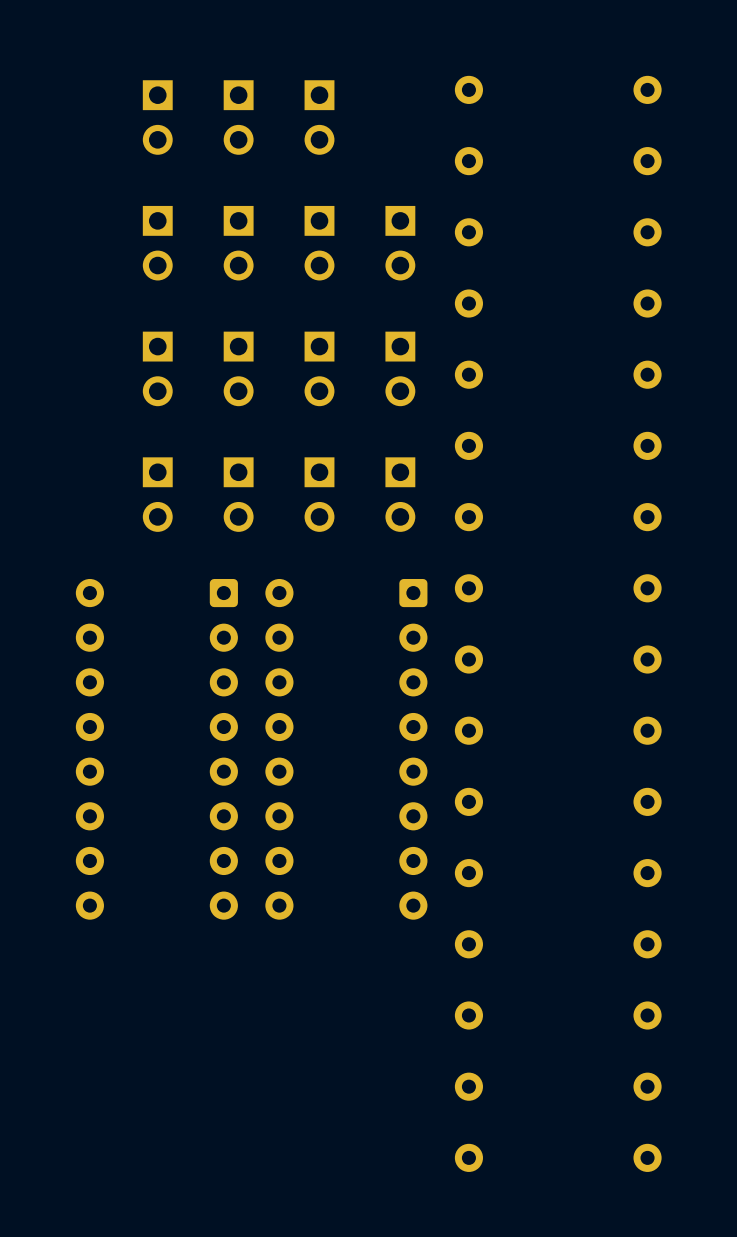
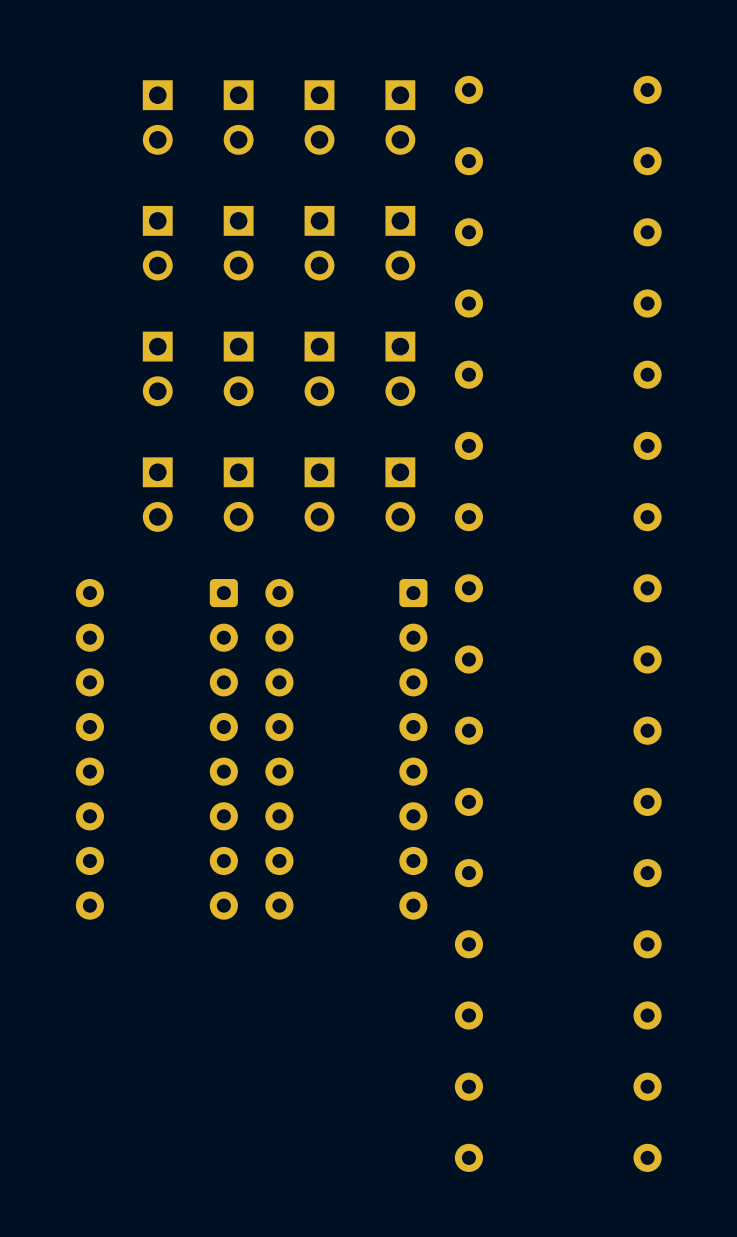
part: none -> (400, 117)

